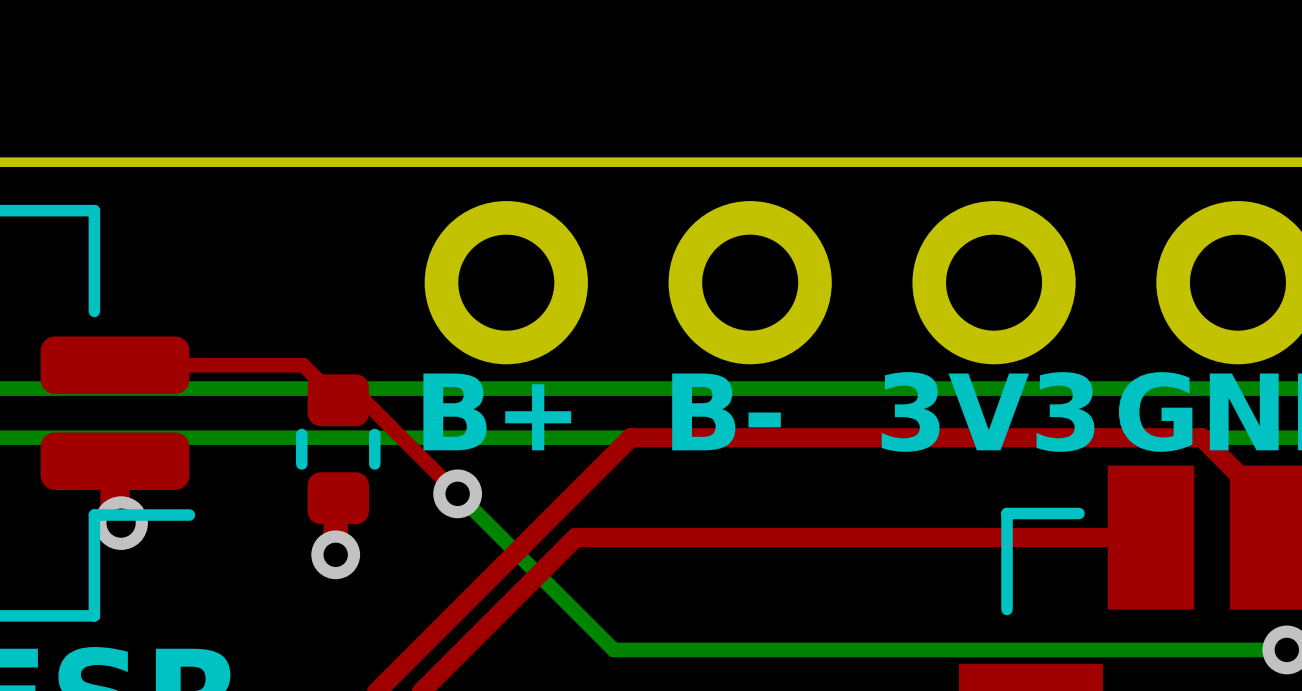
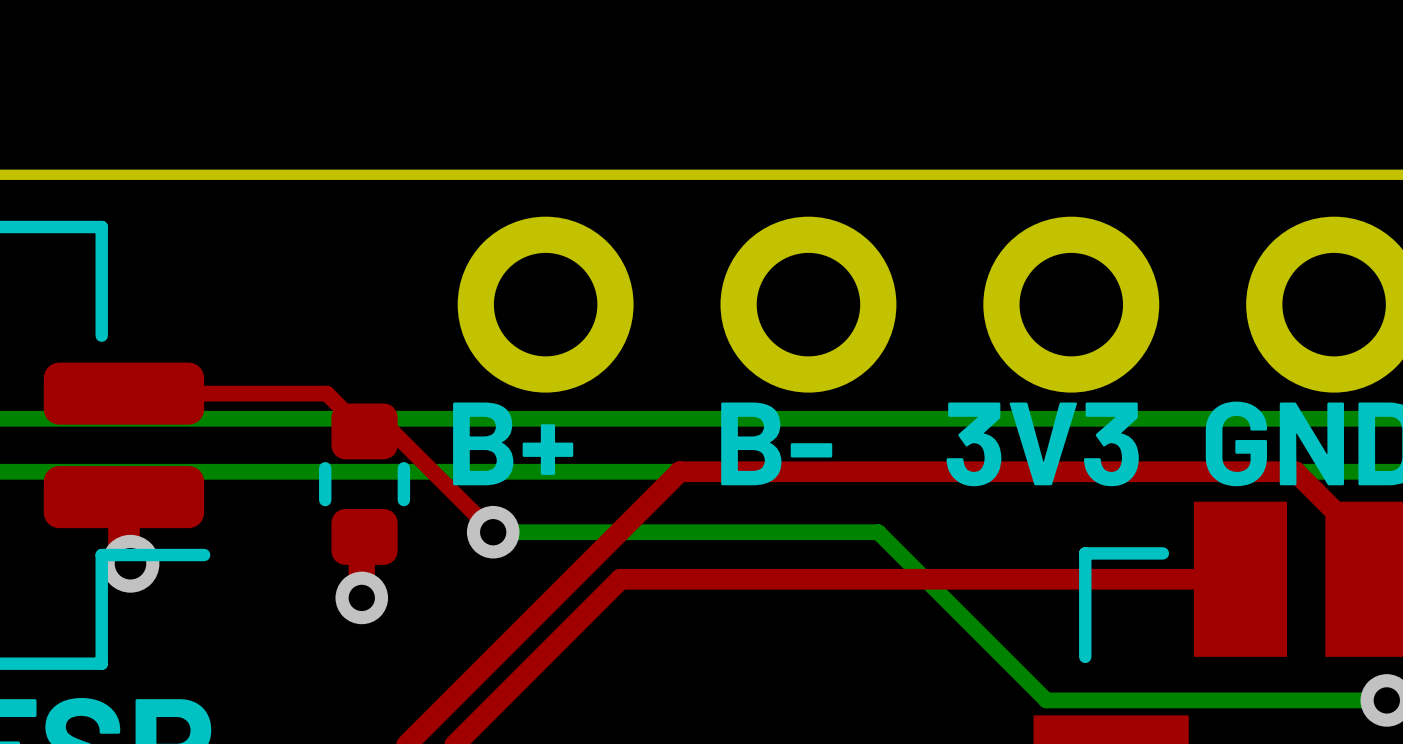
bottom track: (457, 493) (613, 649) (971, 649) -> (493, 532) (878, 532) (1046, 700)

